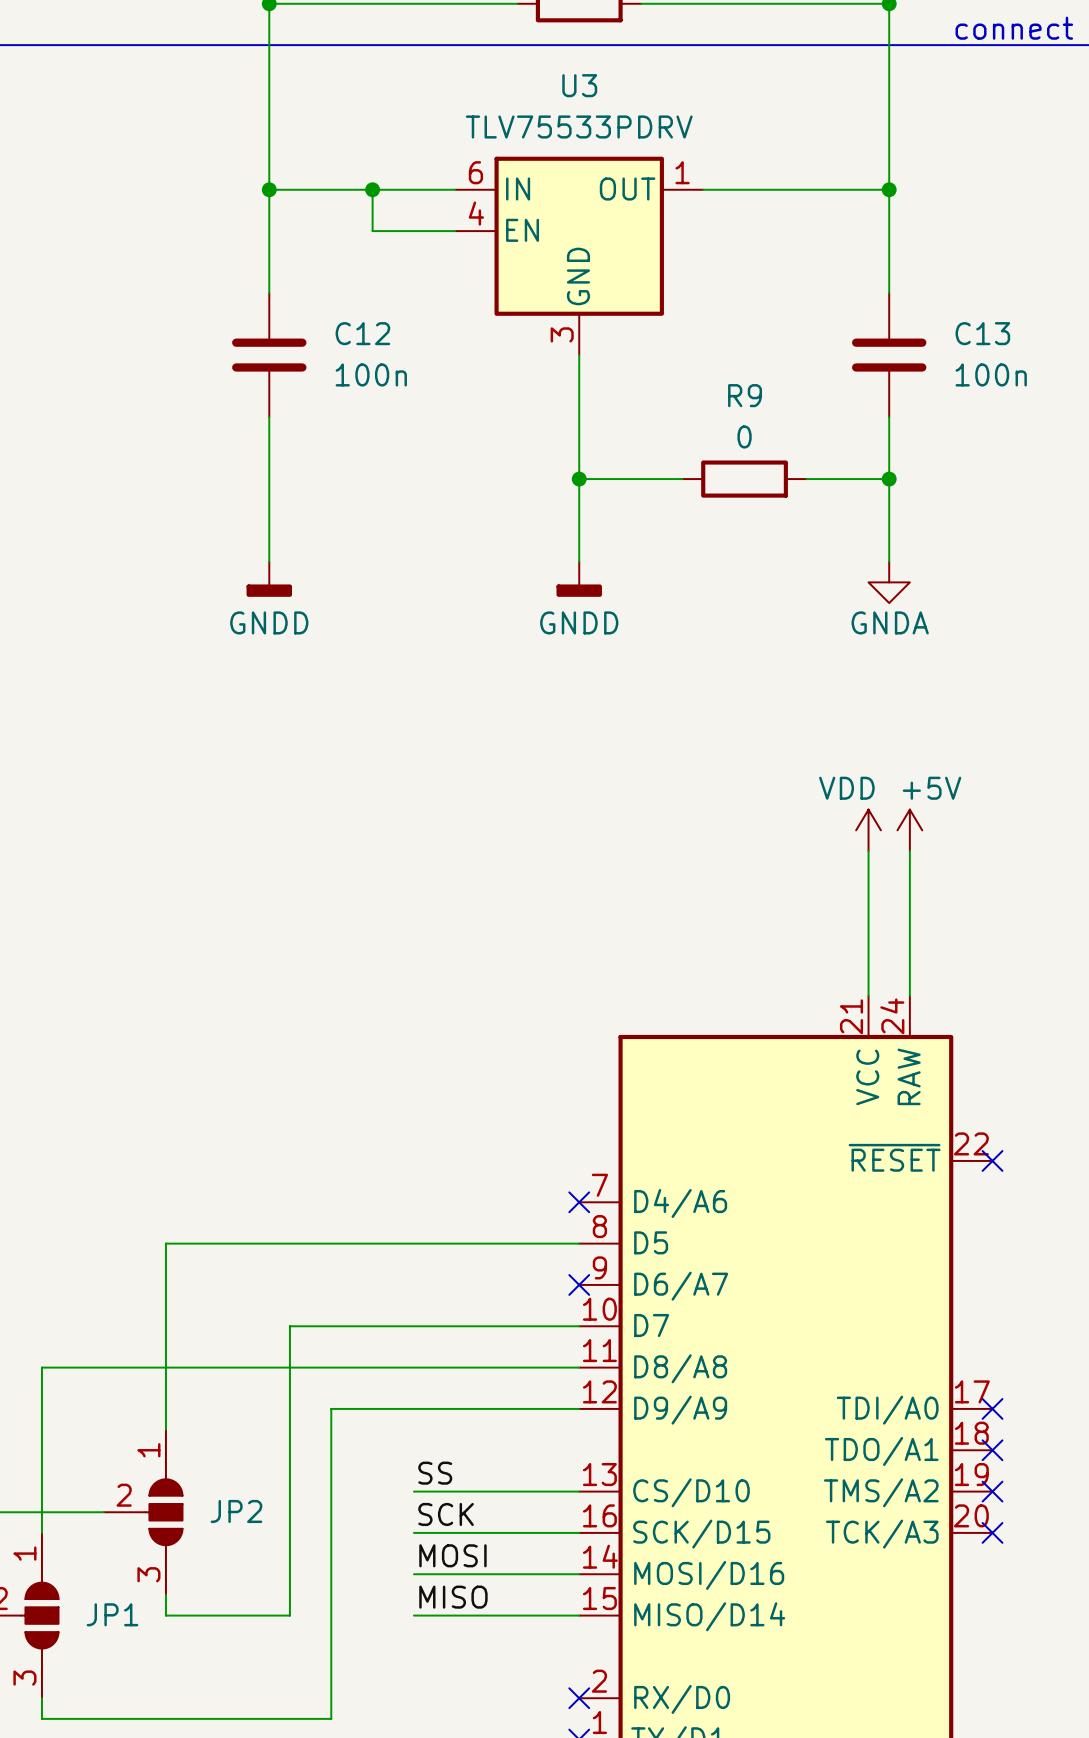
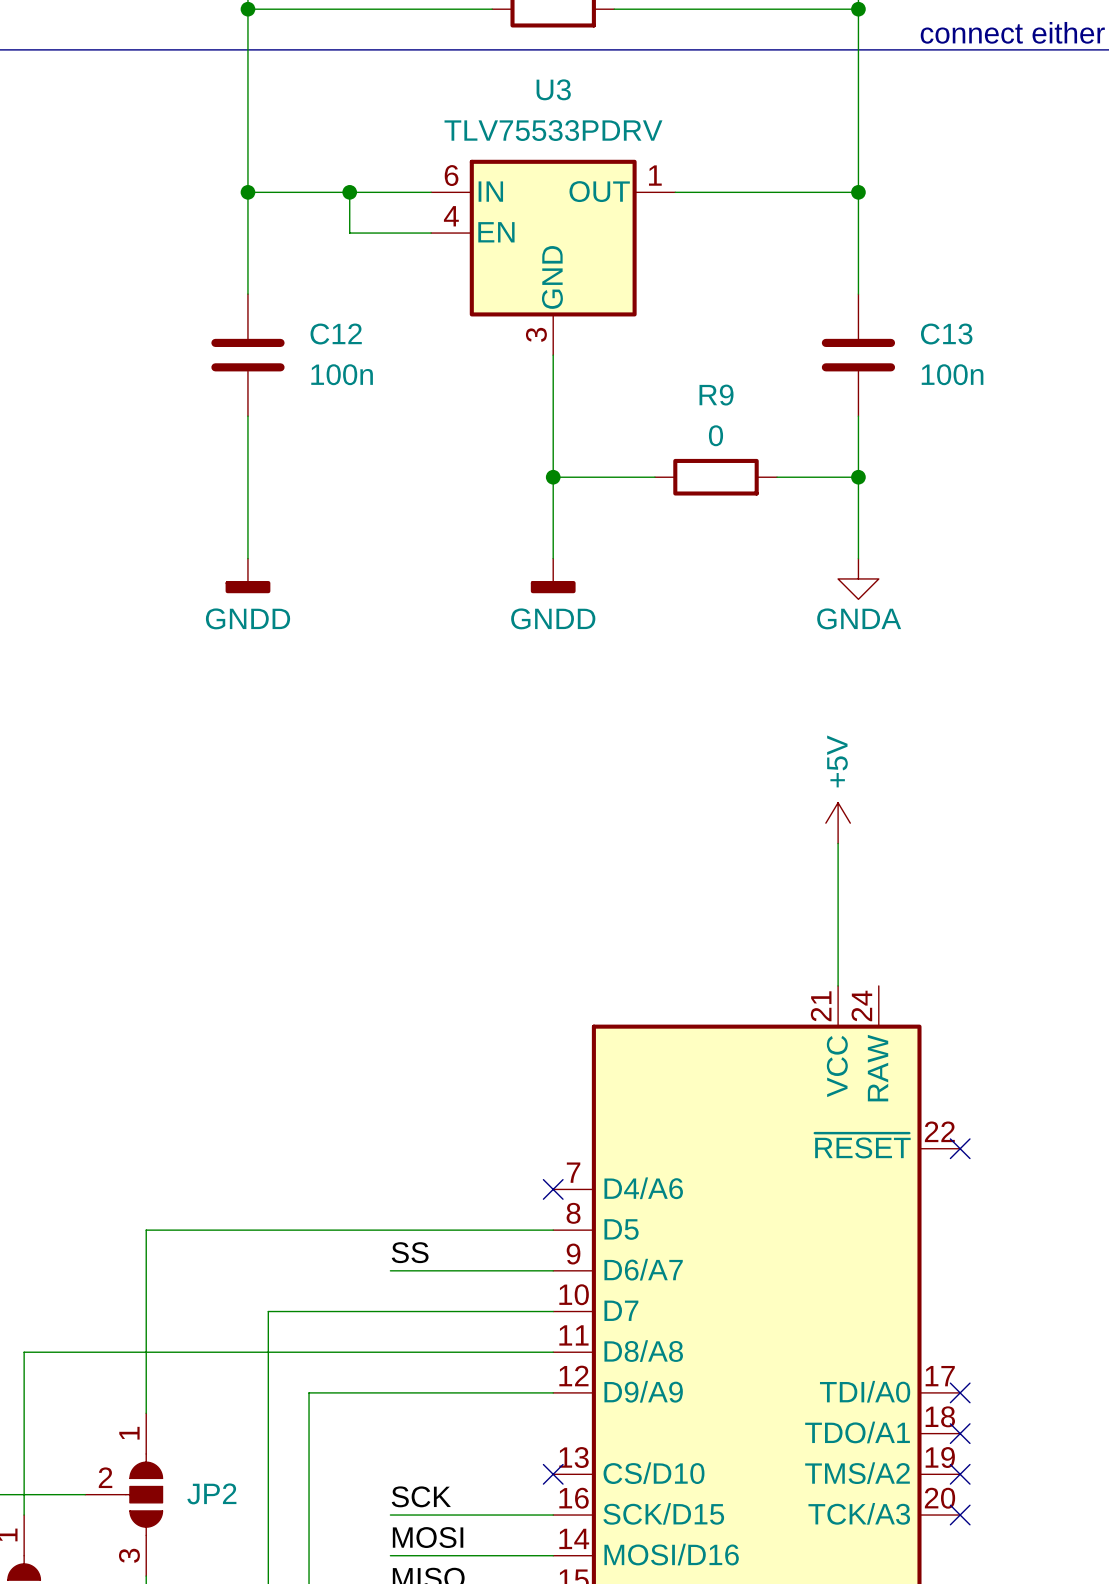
power symbol: VDD (868, 830) -> +5V (838, 823)
power symbol: +5V (909, 830) -> none
wire: (909, 851) (909, 995) -> none
no-connect mark: (579, 1284) -> none
label position: SS (435, 1473) -> SS (410, 1252)
wire: (413, 1491) (579, 1491) -> (390, 1270) (553, 1270)
no-connect mark: none -> (553, 1474)

